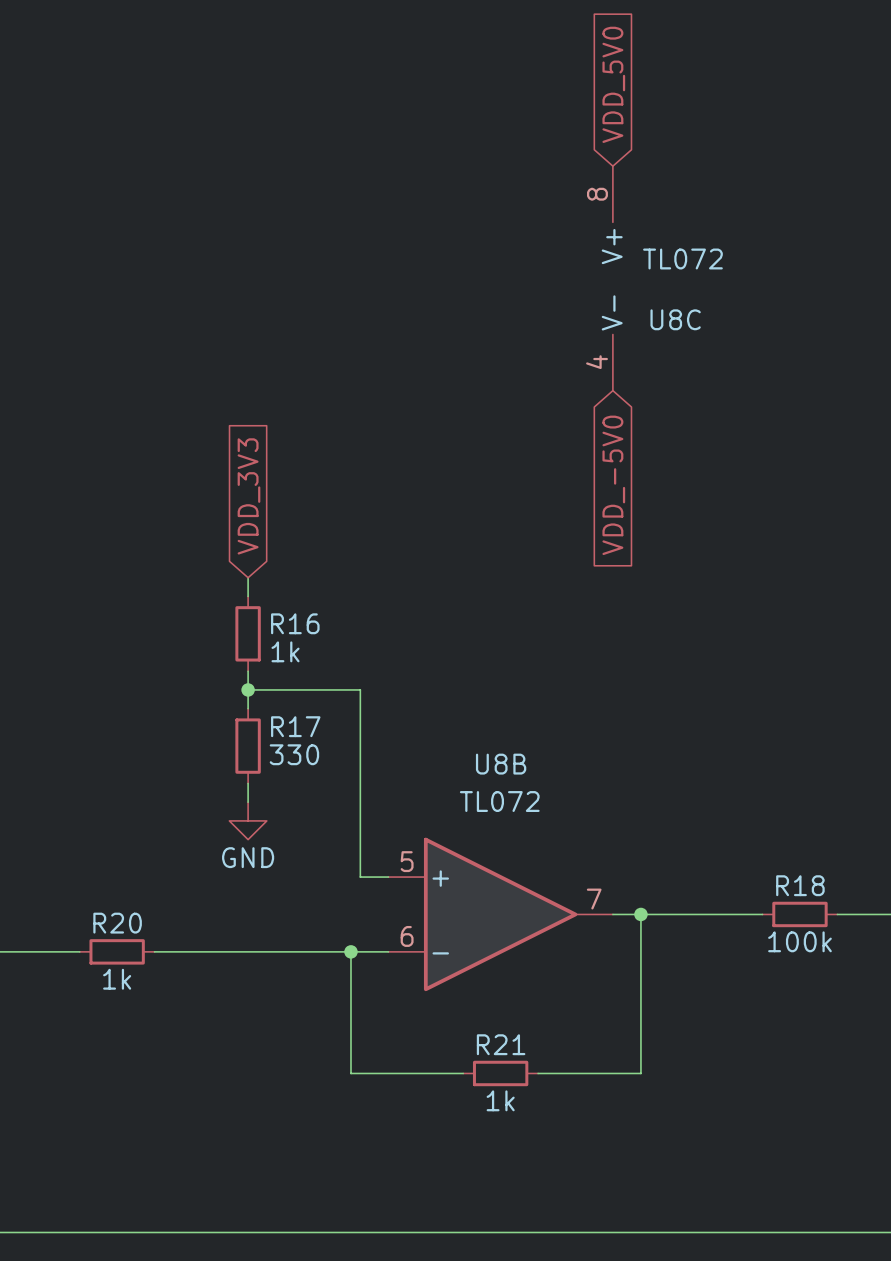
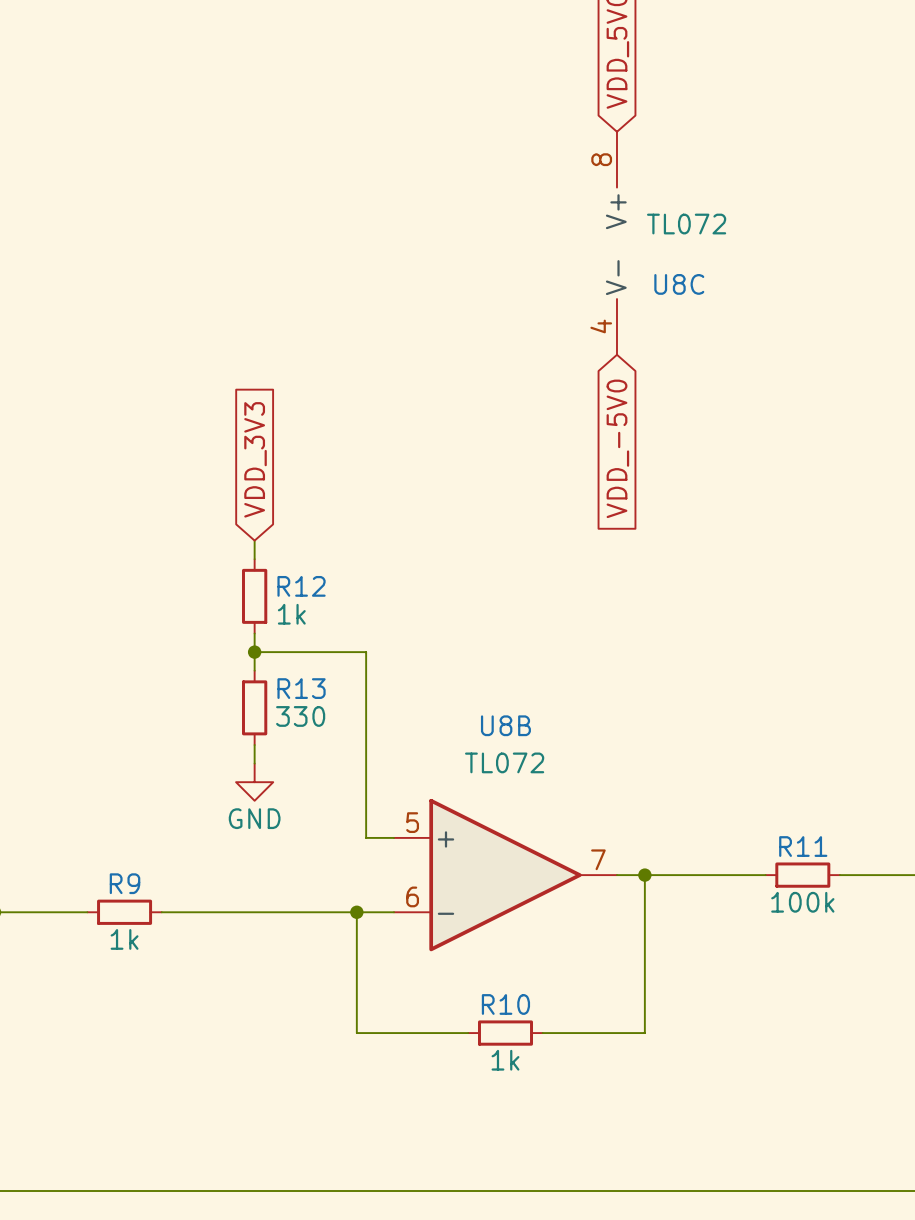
R16 name: R16 (295, 623) -> R12 (301, 586)
R17 name: R17 (295, 726) -> R13 (301, 688)
R18 name: R18 (800, 885) -> R11 (803, 846)
R20 name: R20 (117, 923) -> R9 (125, 883)
R21 name: R21 (501, 1044) -> R10 (505, 1004)

